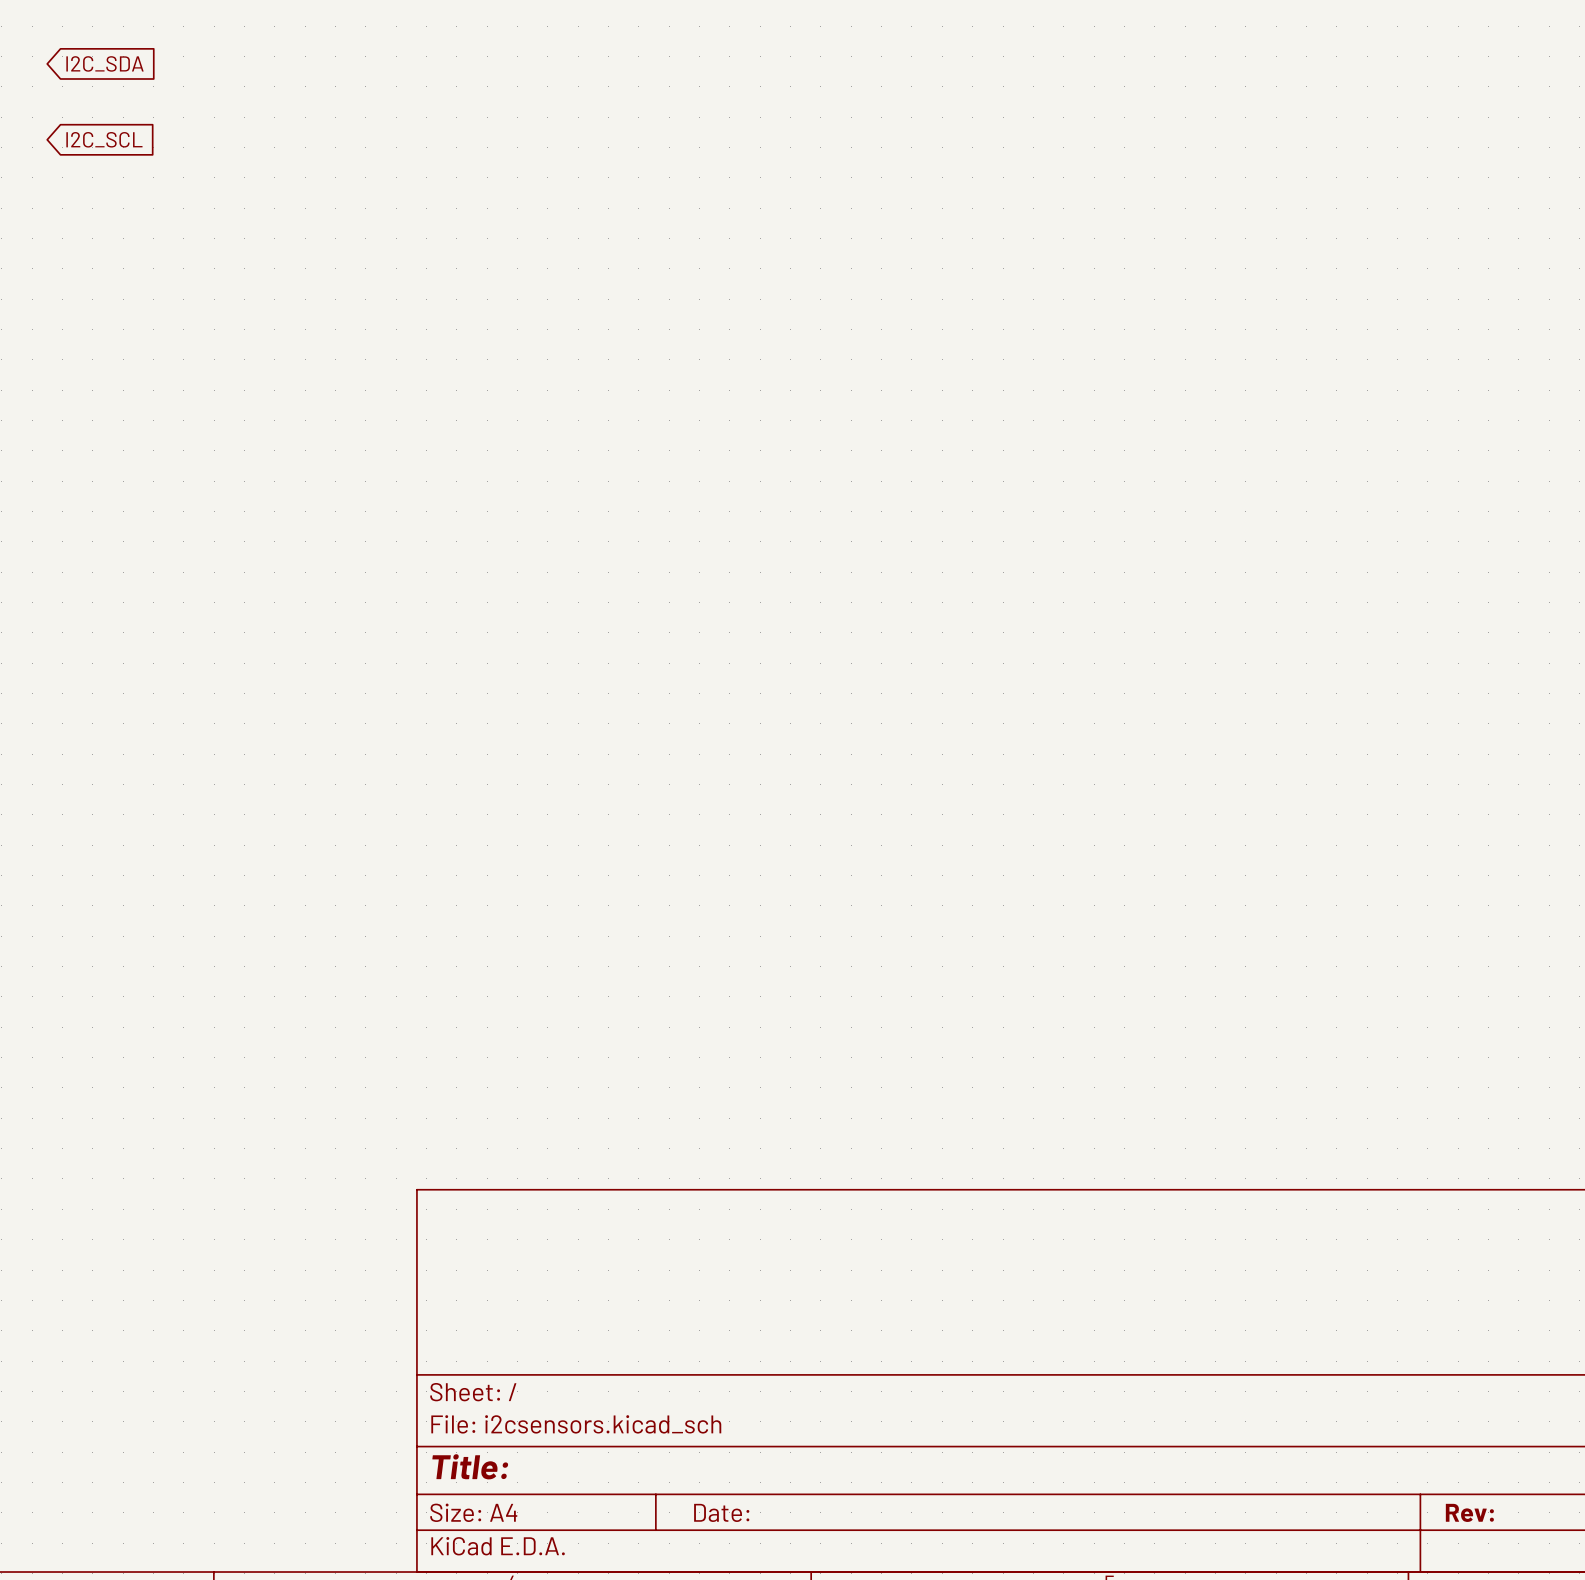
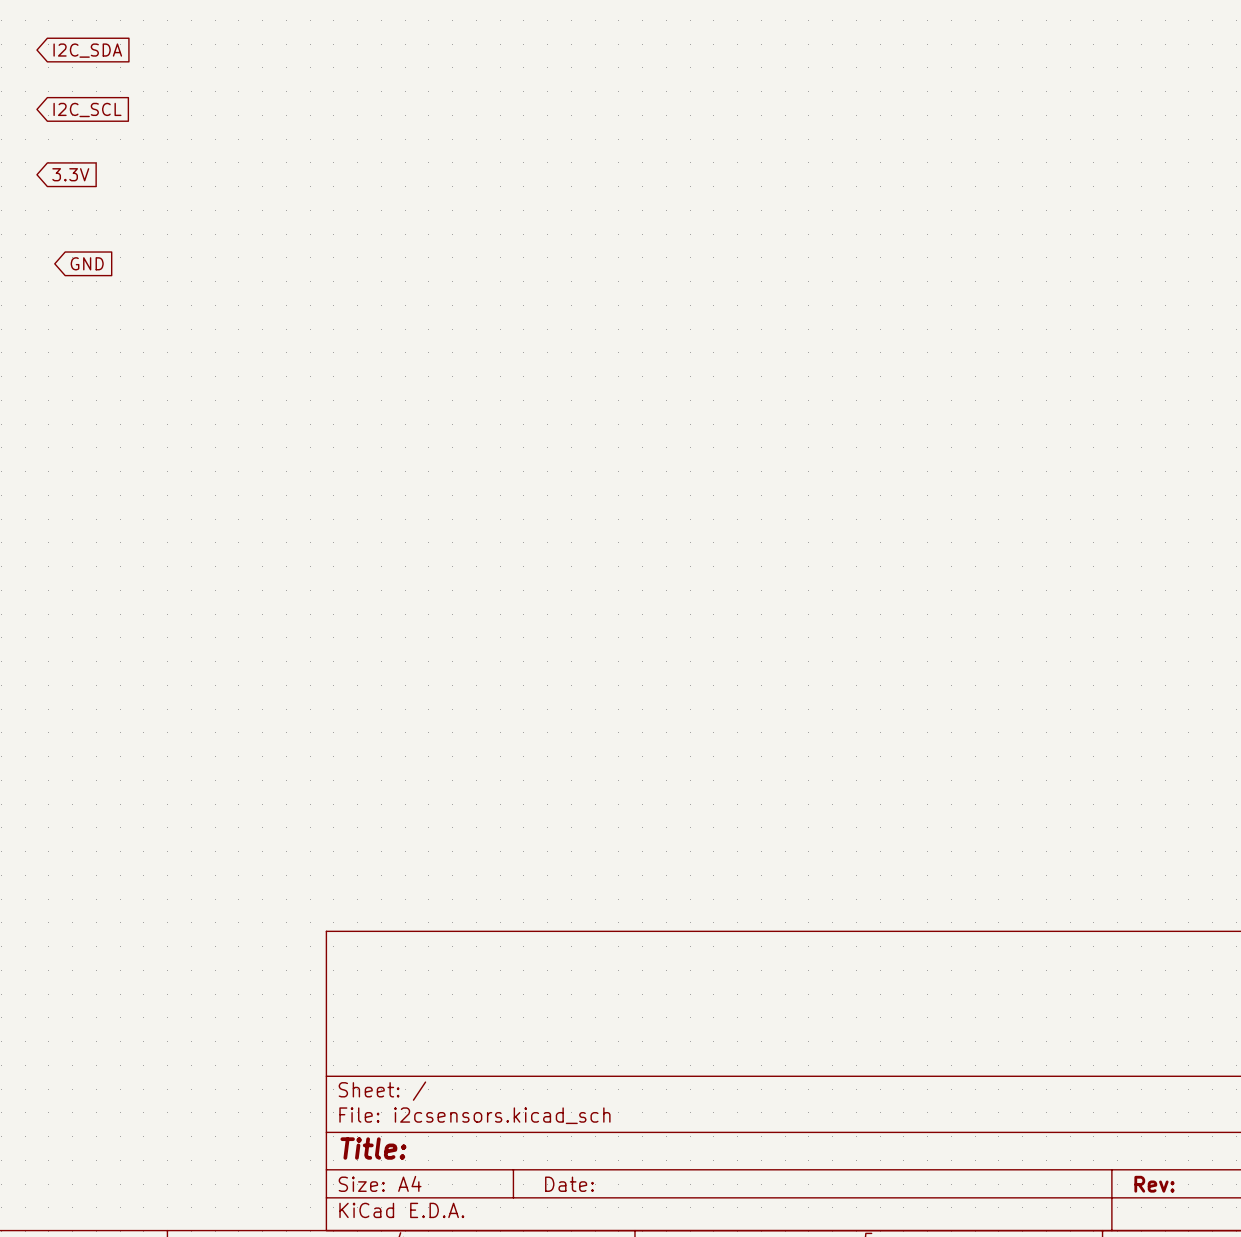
global label: none -> 3.3V (70, 174)
global label: none -> GND (87, 263)

